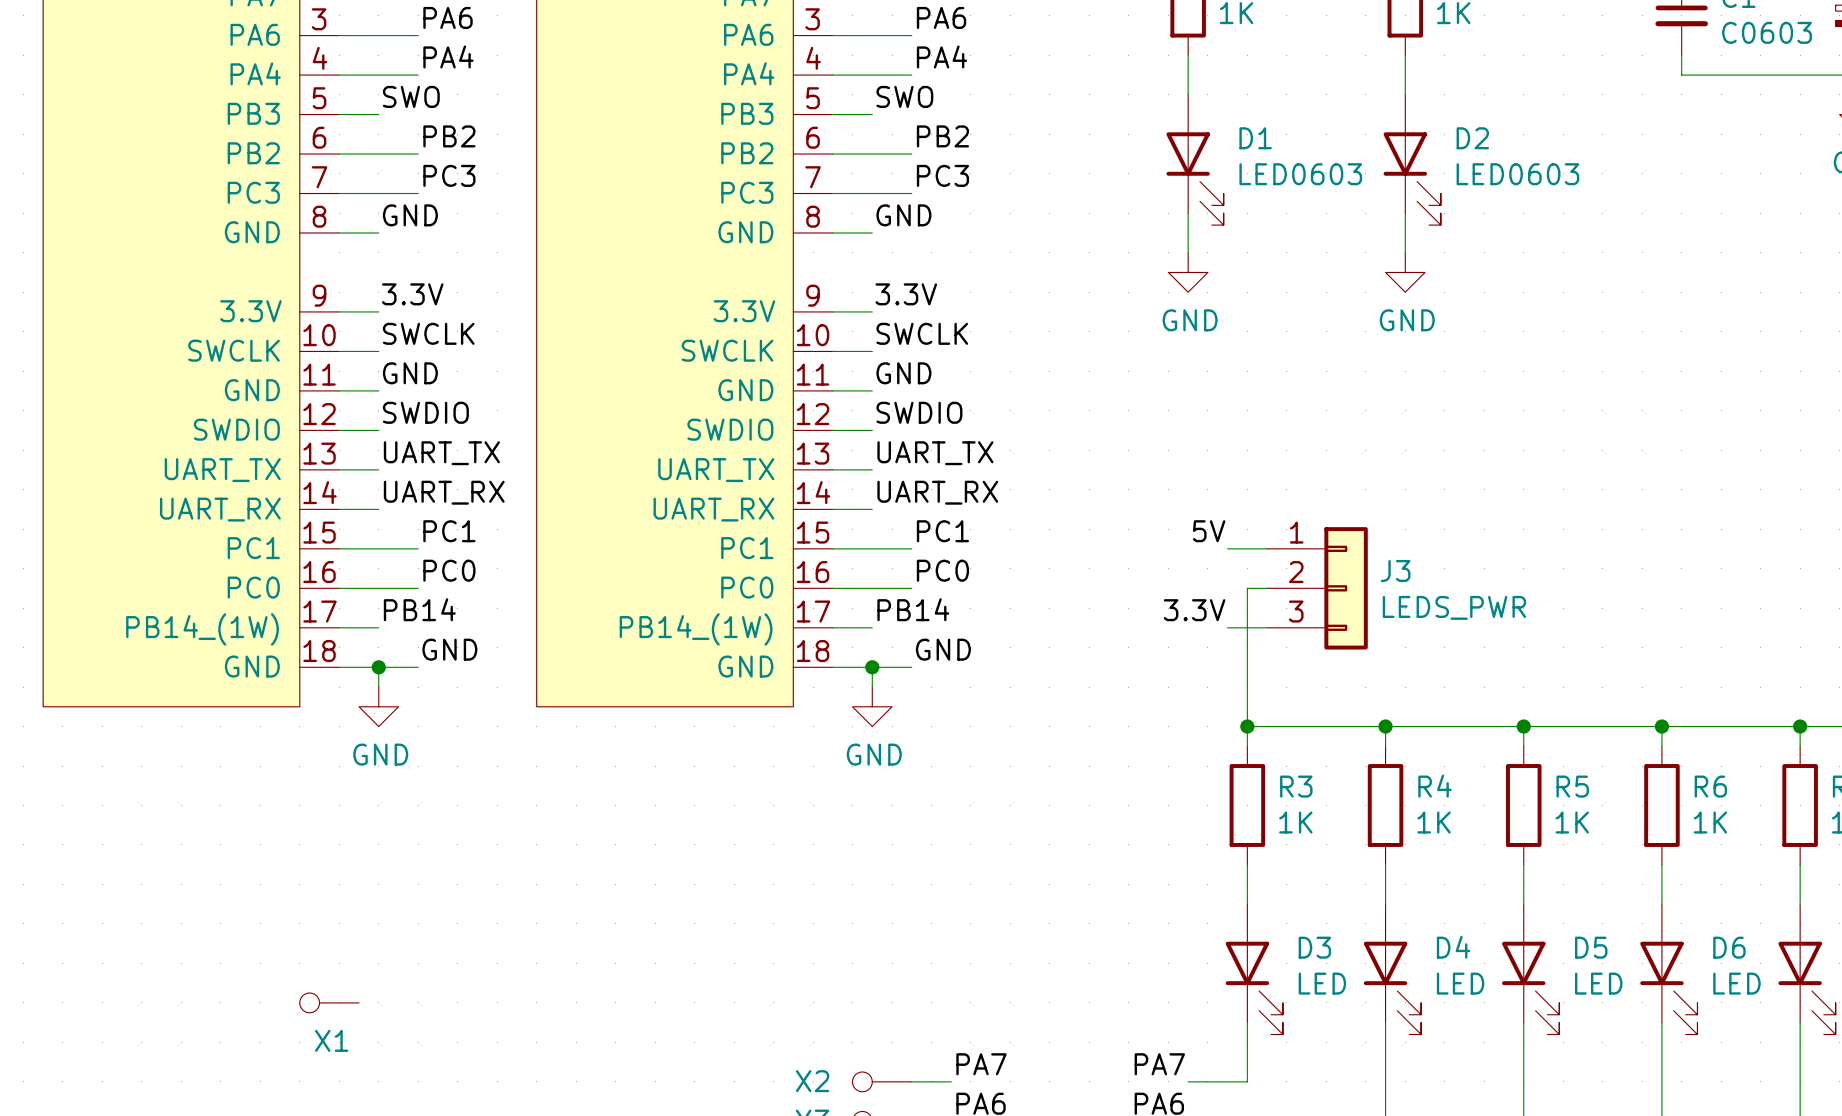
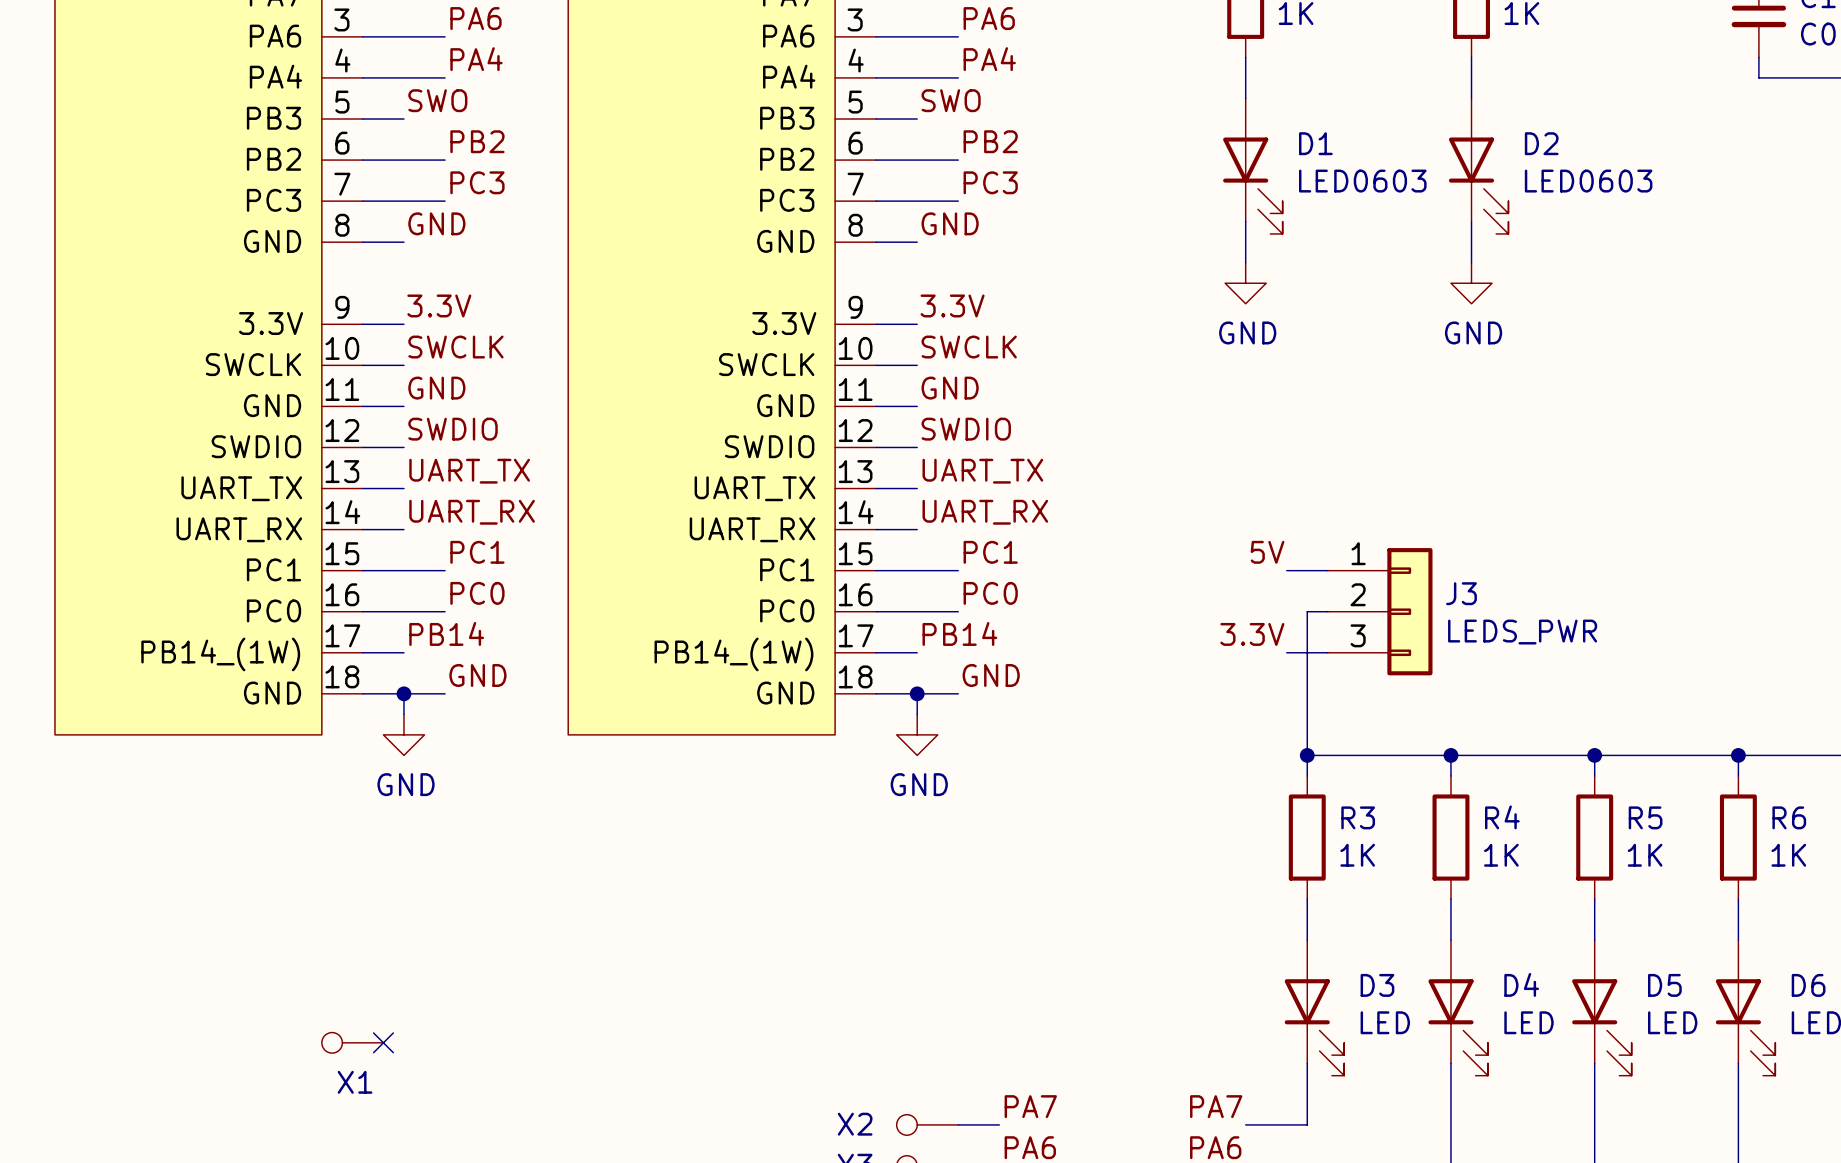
no-connect mark: none -> (383, 1042)

